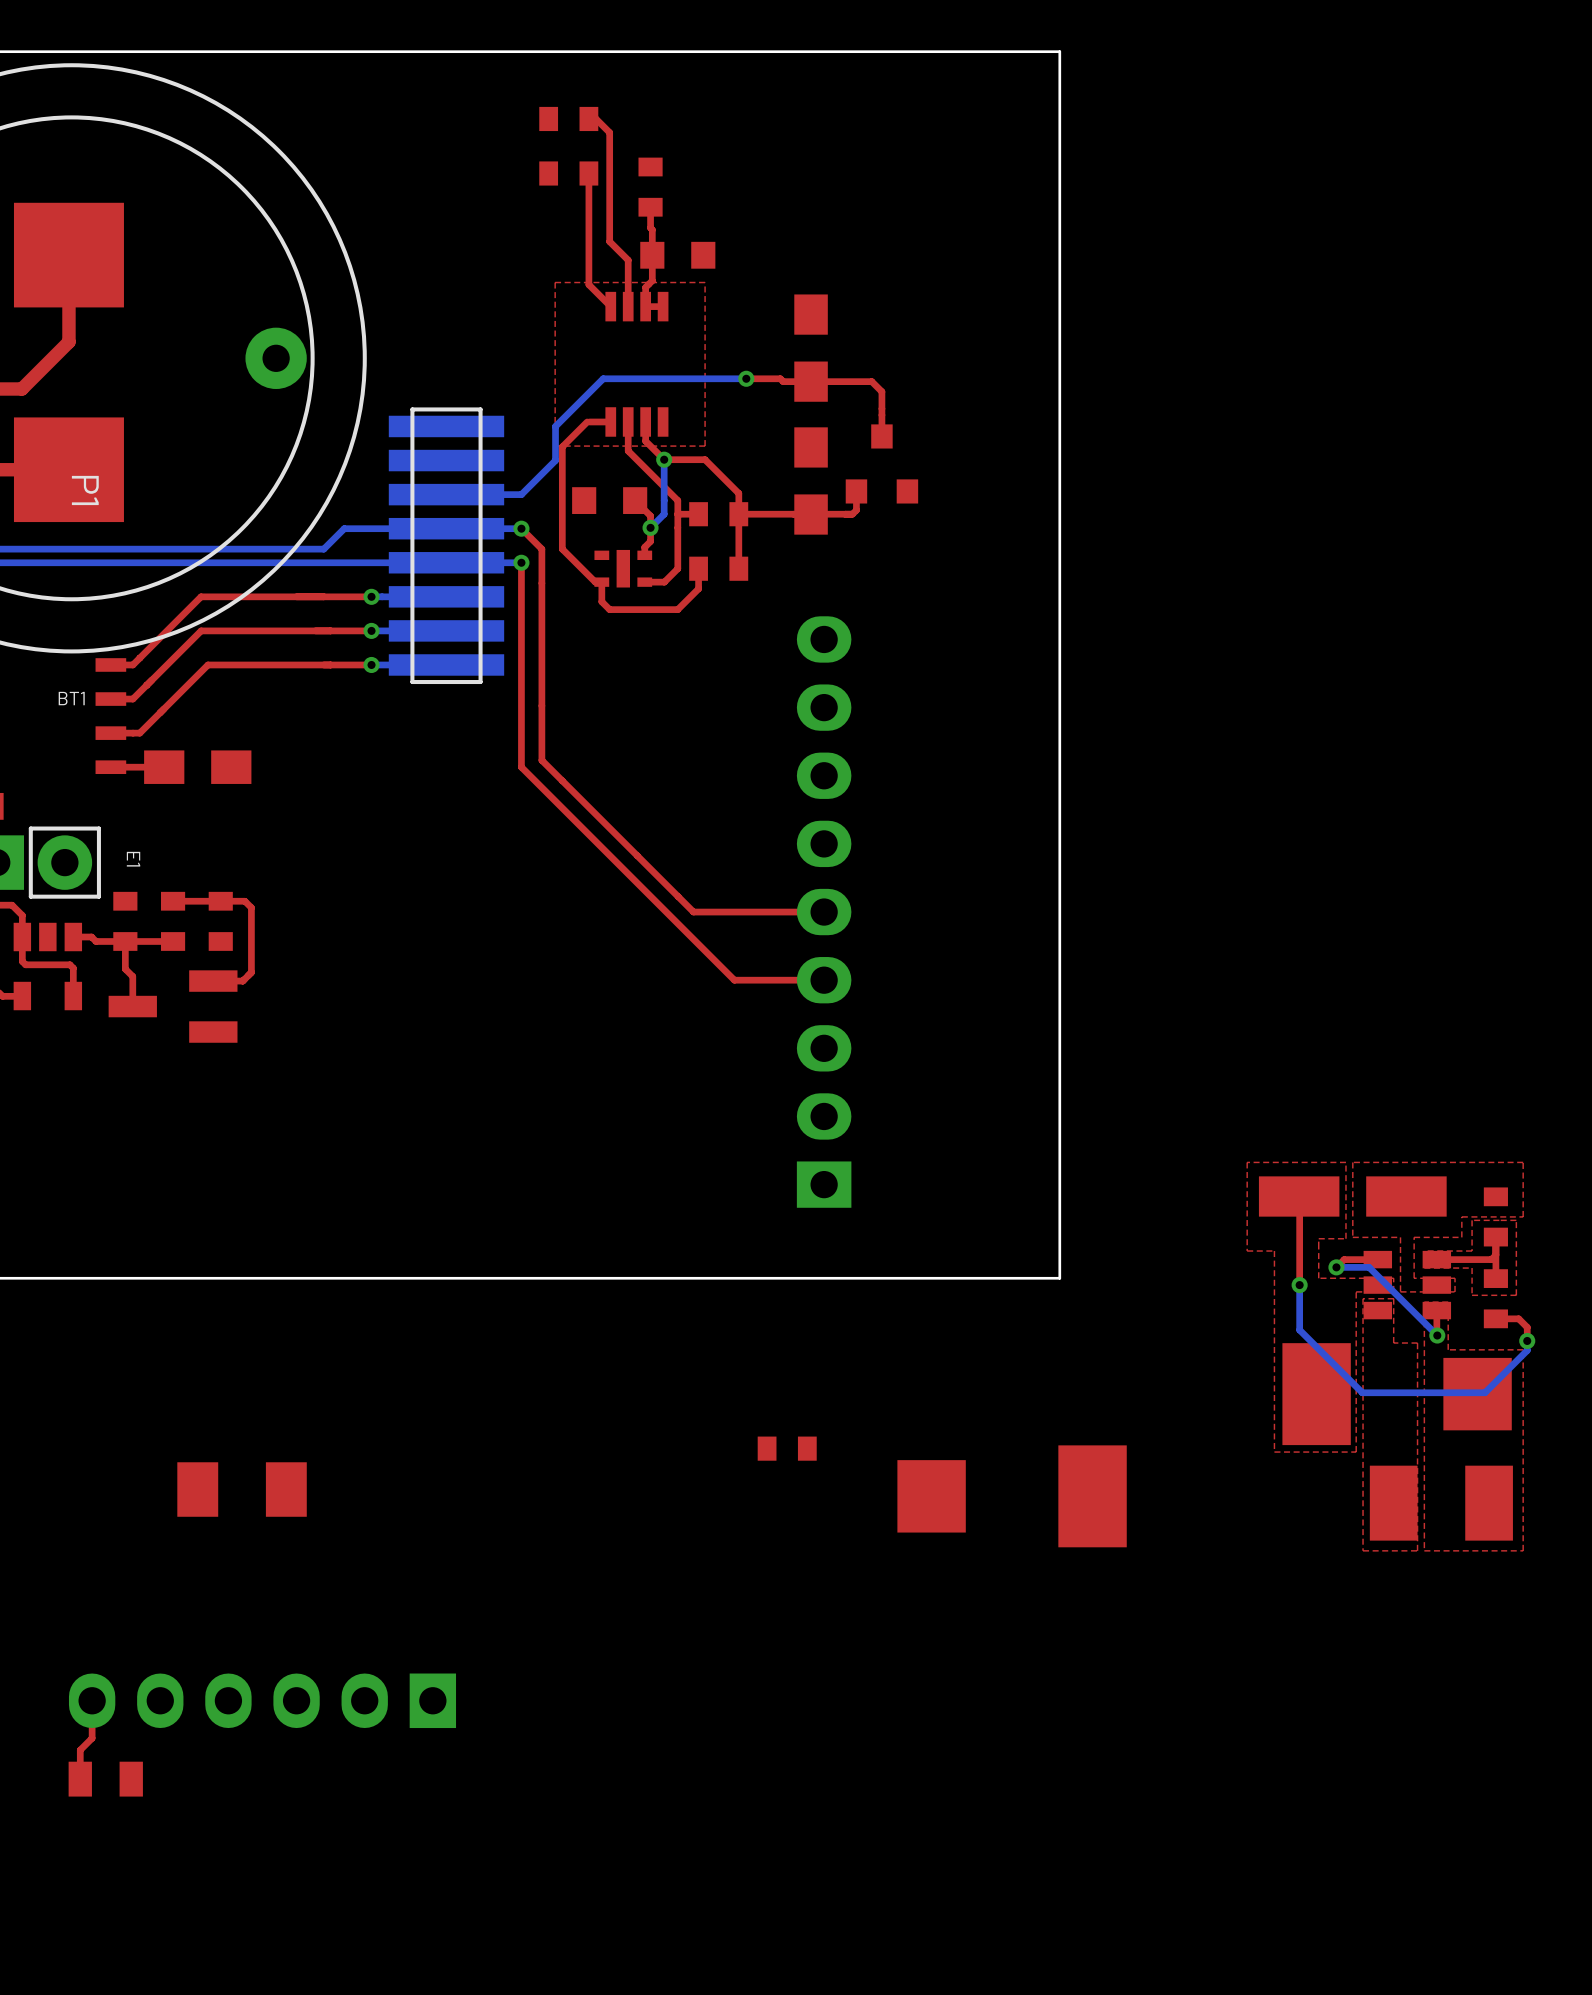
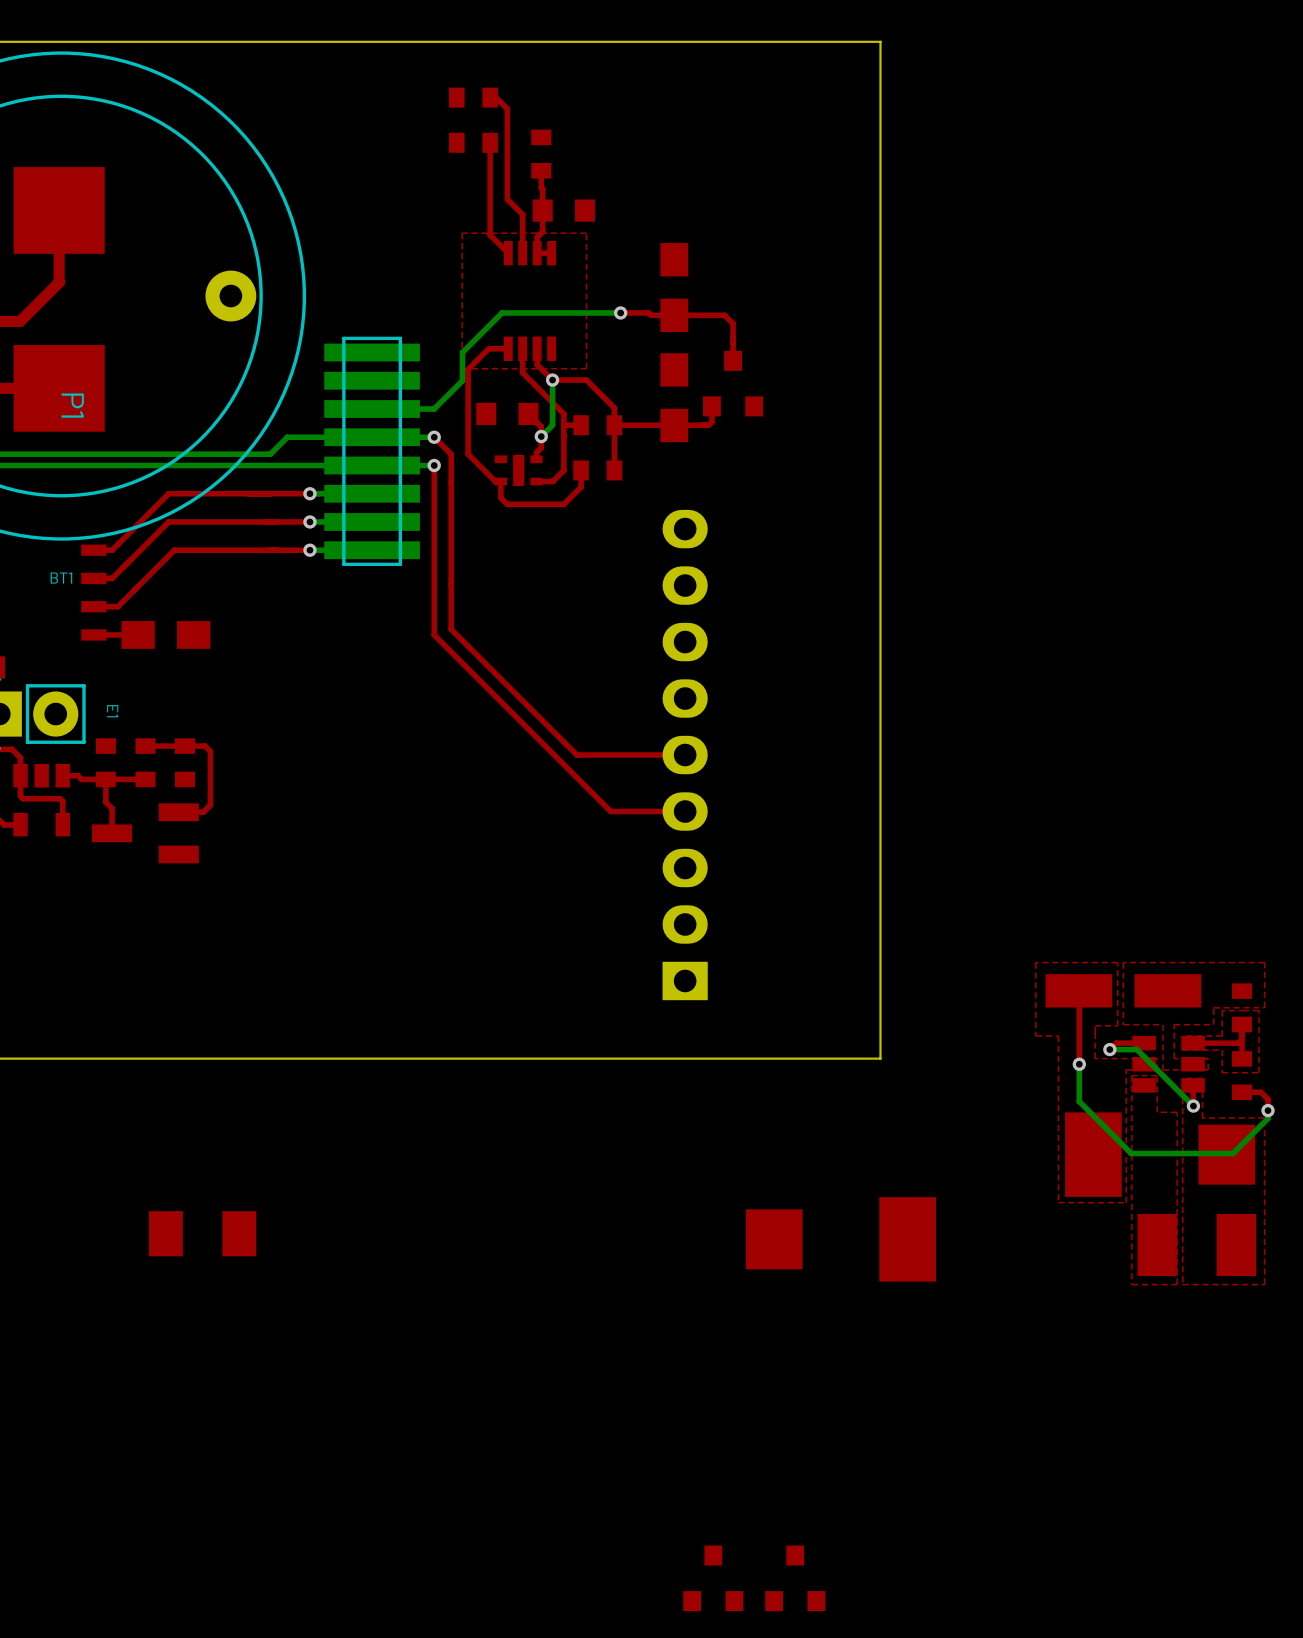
part: (787, 1448) -> none
top track: (92, 1700) (92, 1738) (80, 1750) (80, 1779) -> none
part: (262, 1700) -> none
part: (105, 1779) -> none
part: none -> (713, 1578)
part: none -> (795, 1578)

